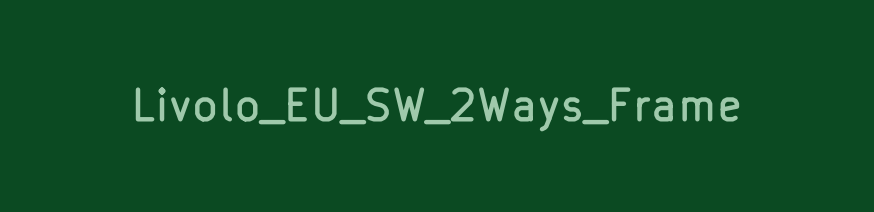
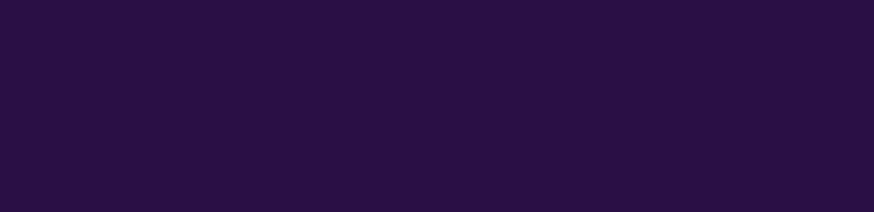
drawing: [135, 87, 740, 132] -> none

